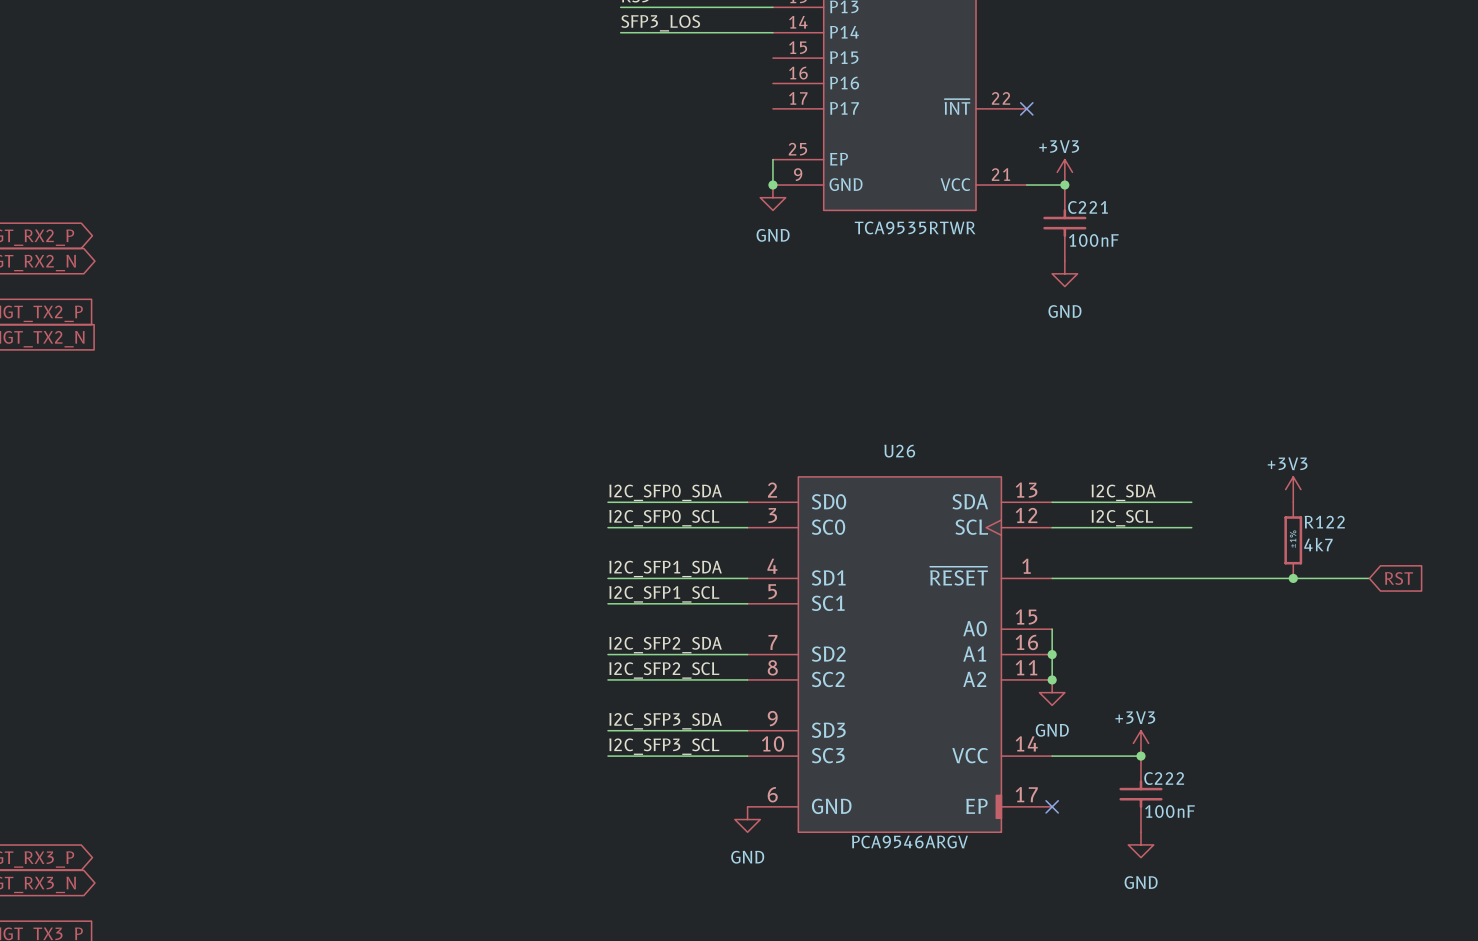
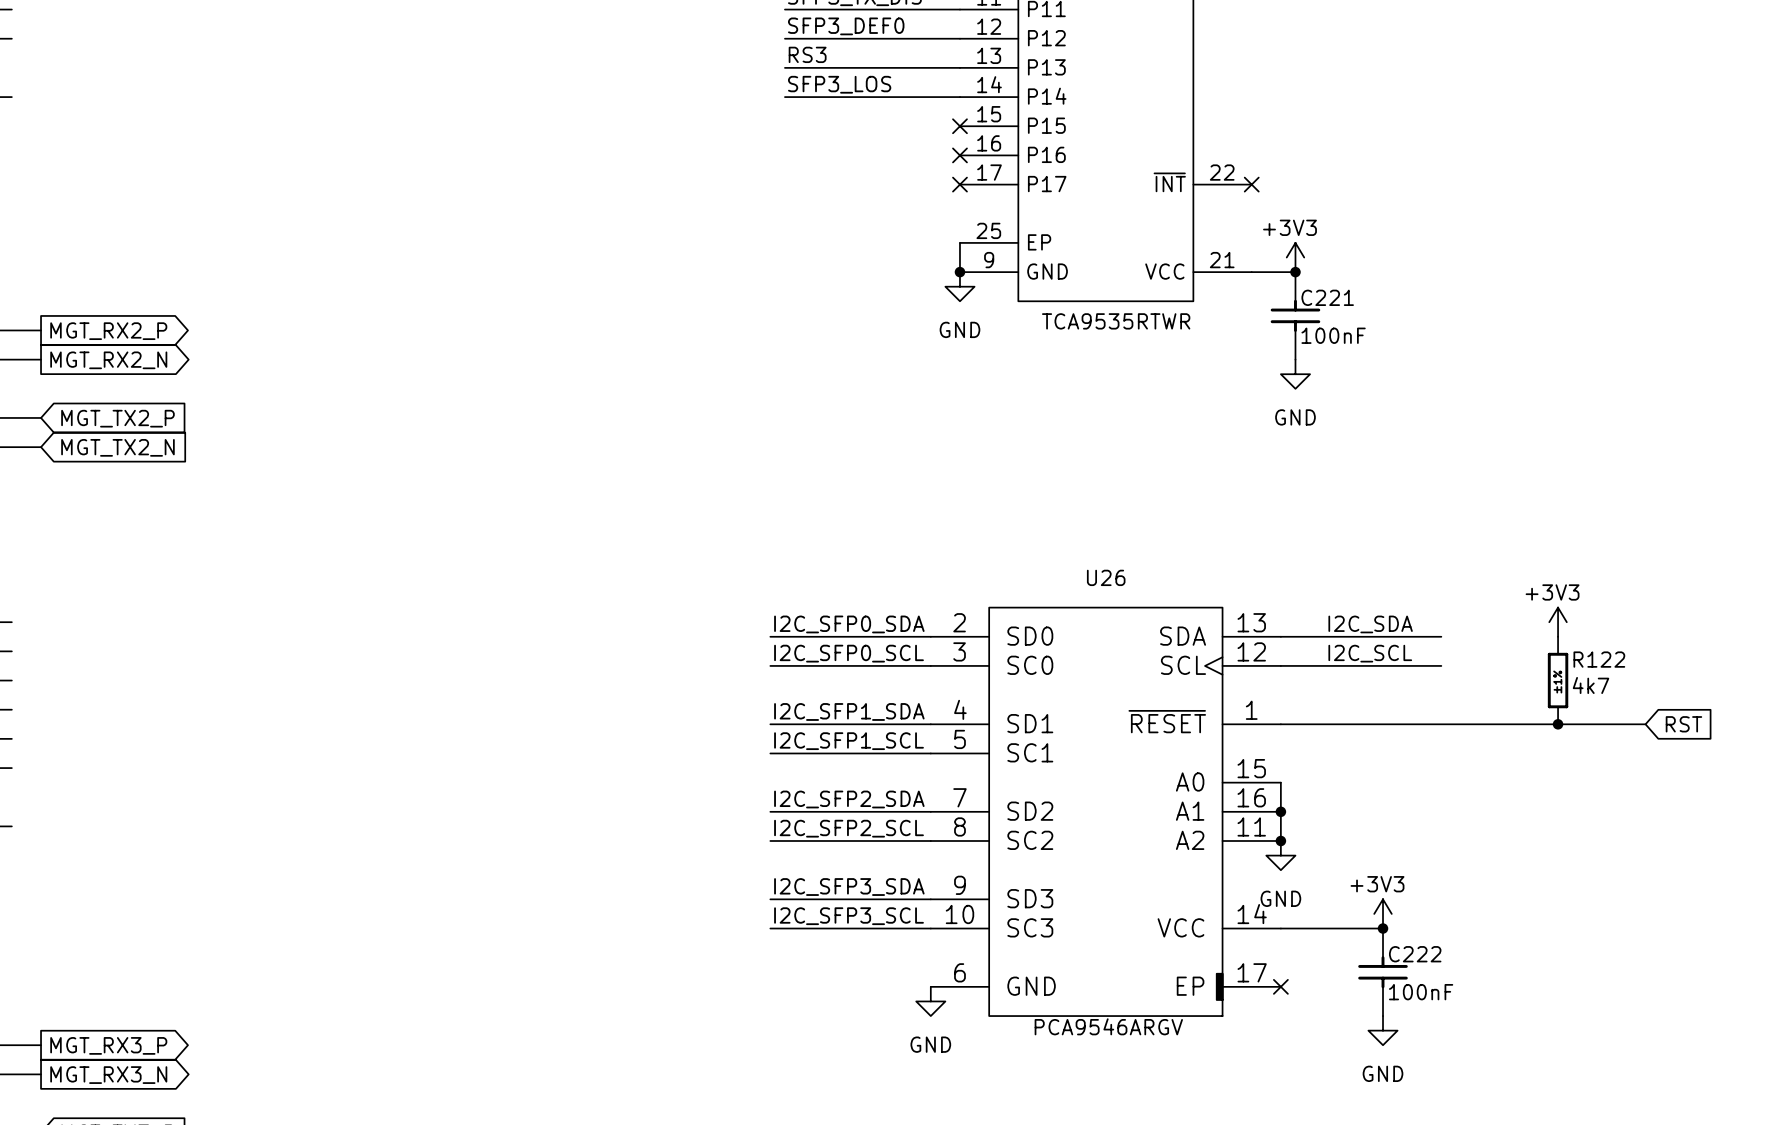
no-connect mark: none -> (959, 126)
no-connect mark: none -> (959, 155)
no-connect mark: none -> (959, 184)

